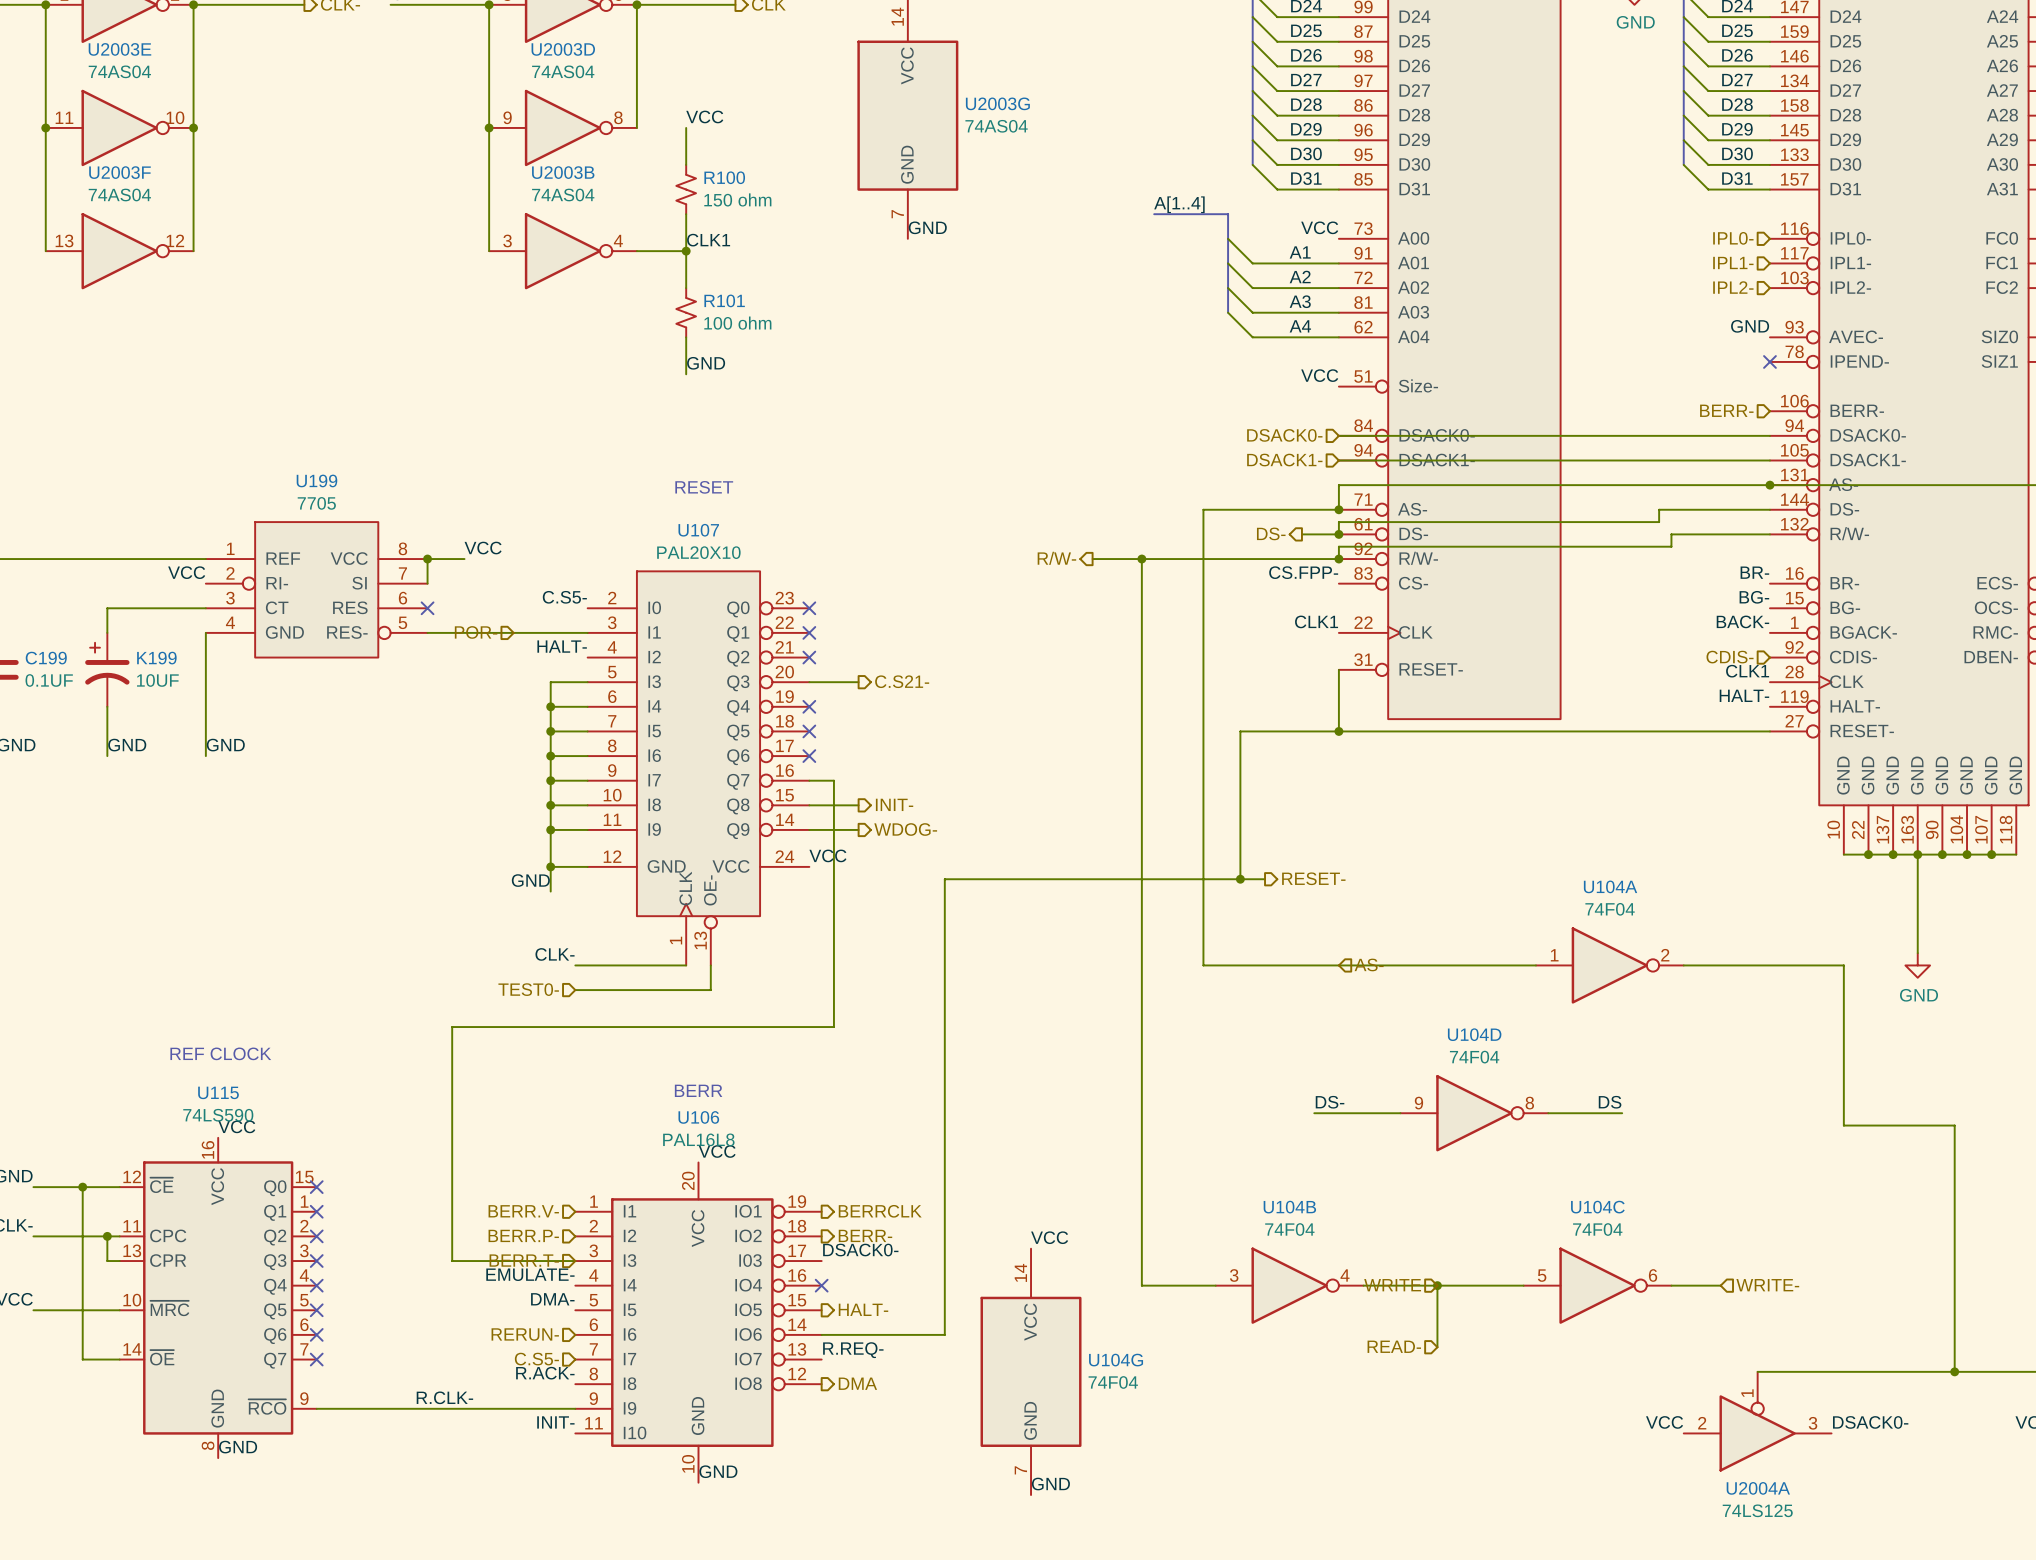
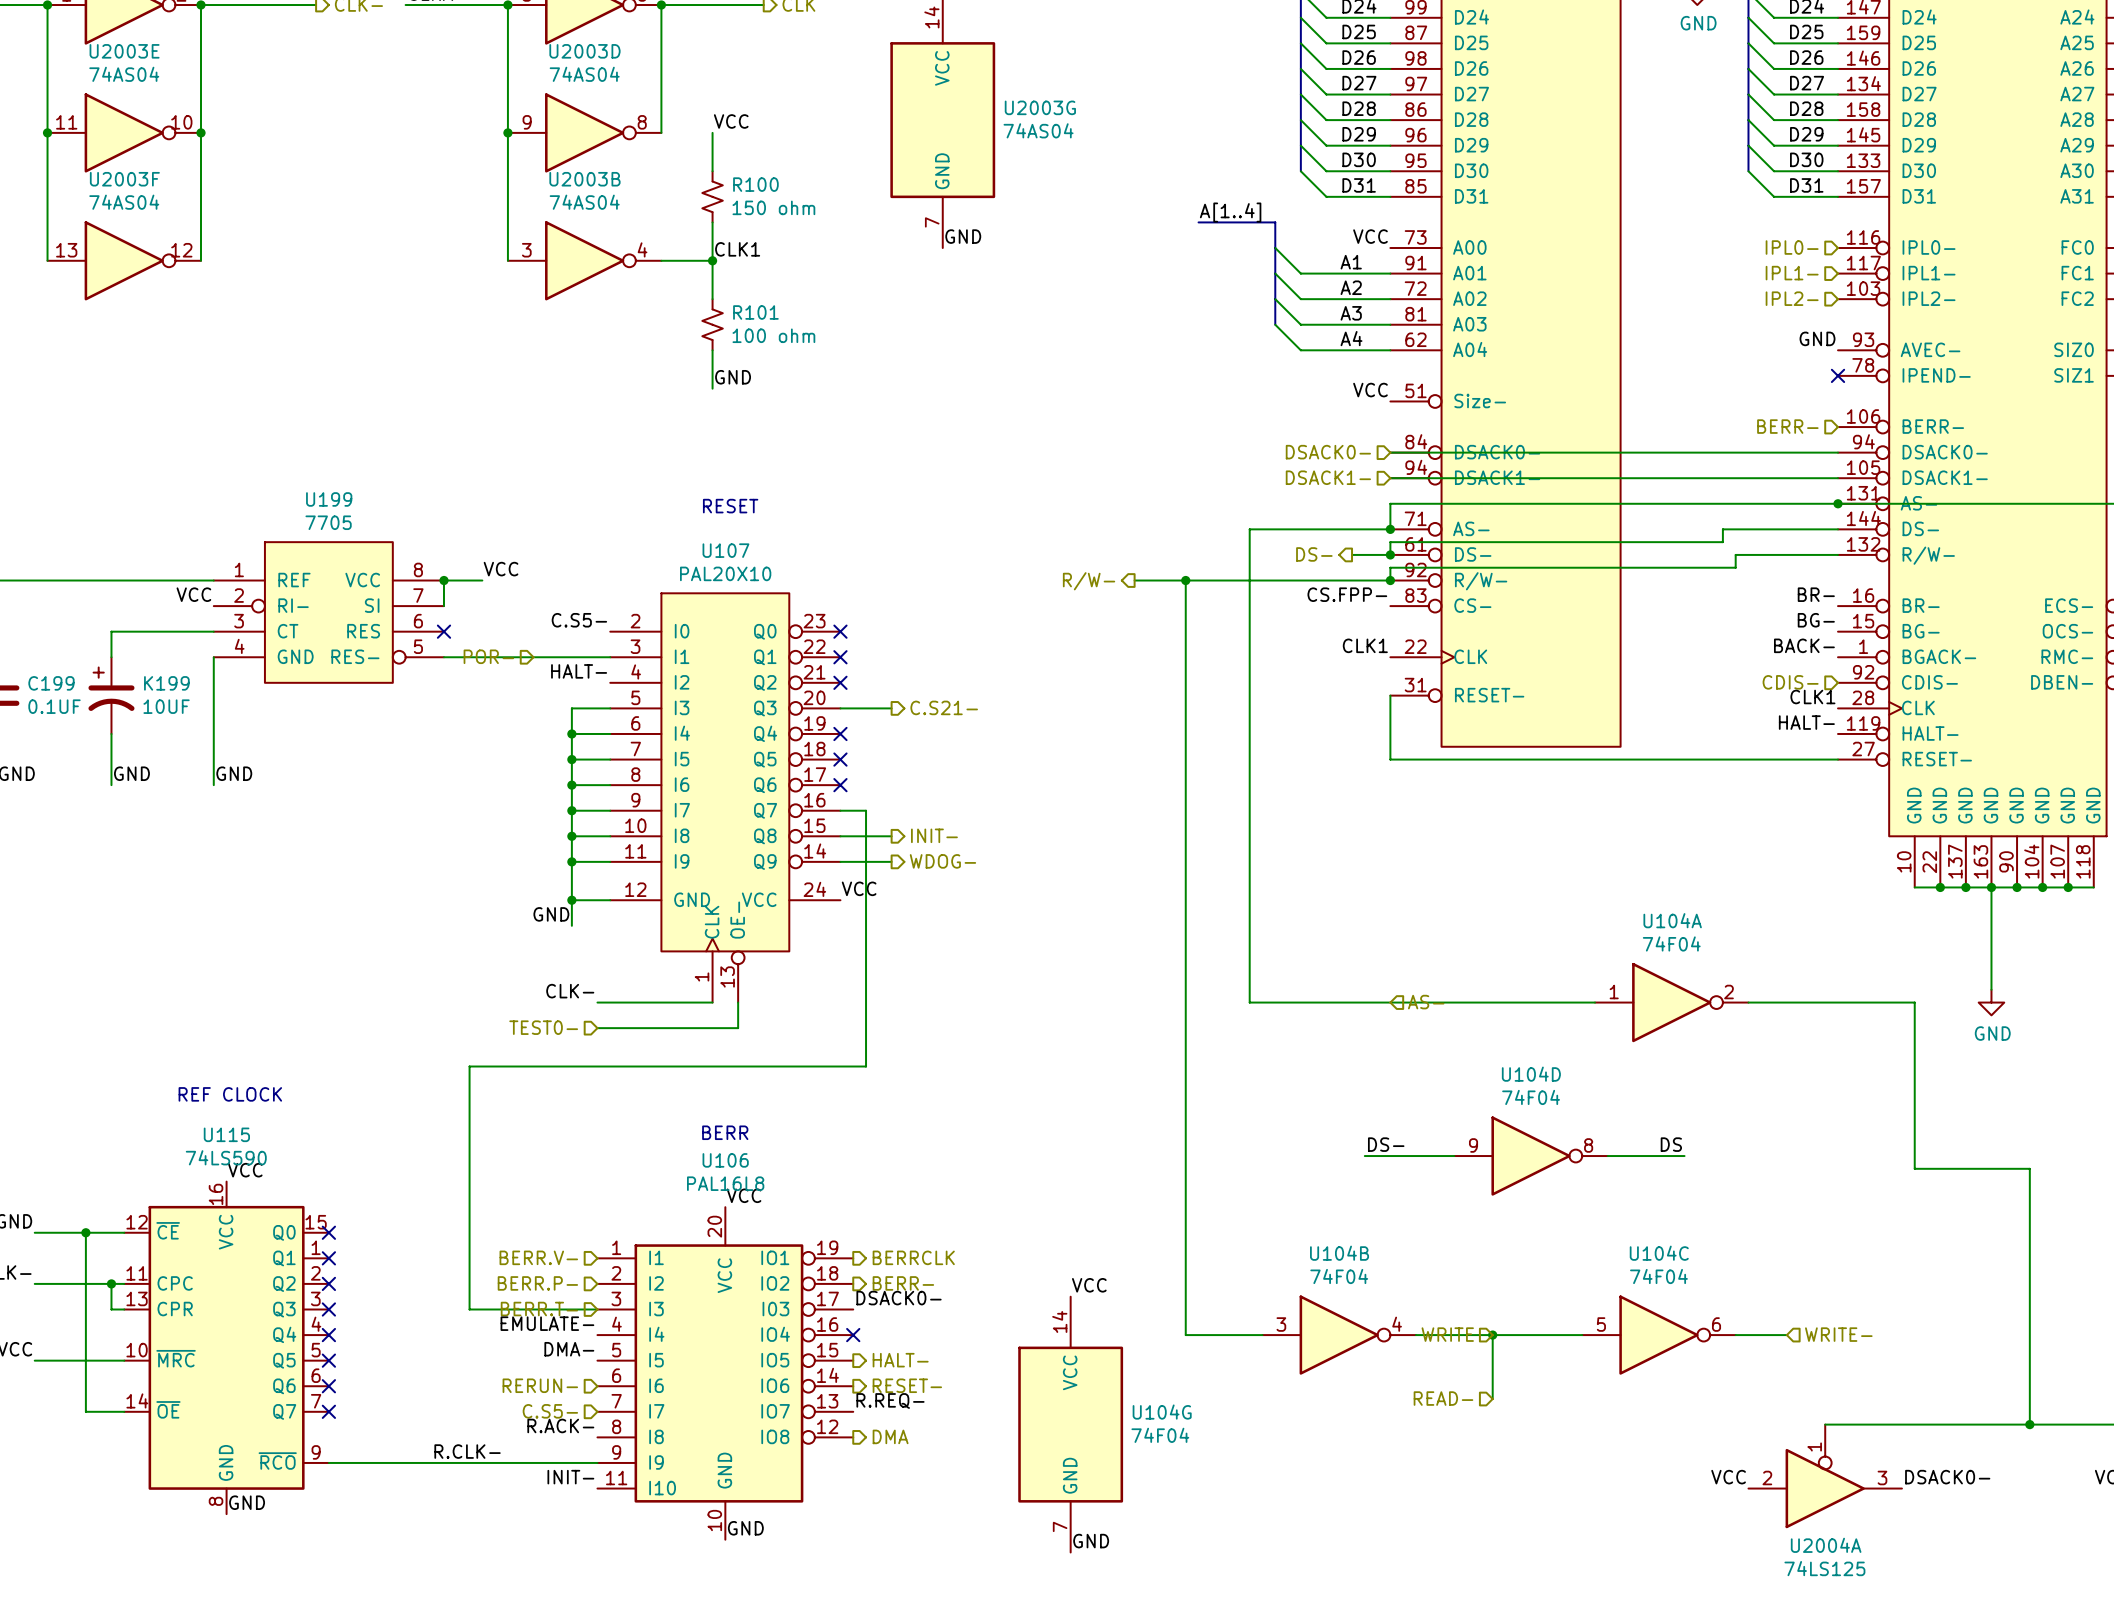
wire: (1338, 731) (1240, 731) (1240, 879) -> none
junction: (1338, 731) -> none
hierarchical label: RESET- (1313, 878) -> none
junction: (1240, 879) -> none
wire: (1265, 879) (944, 879) (944, 1334) (821, 1334) -> none
hierarchical label: none -> RESET- (907, 1385)

